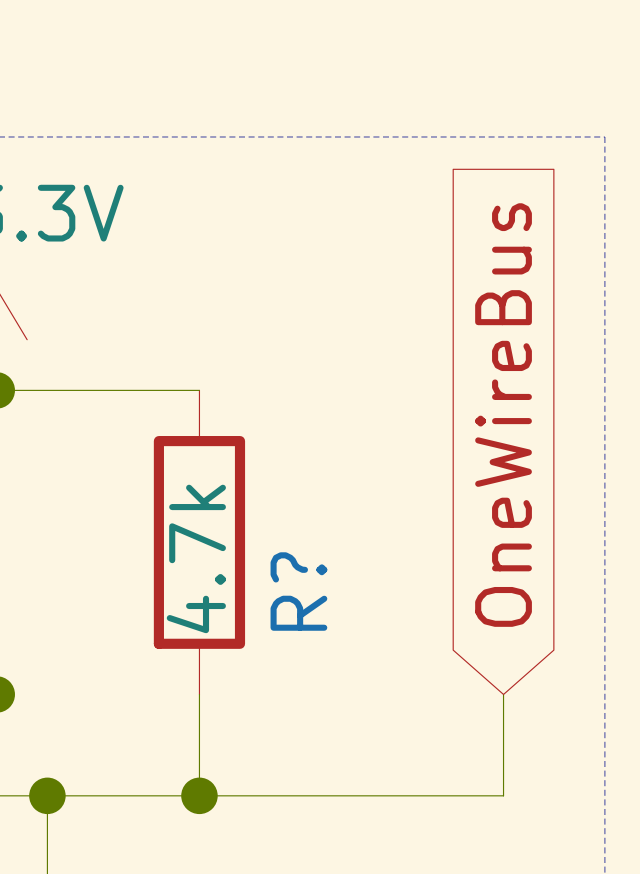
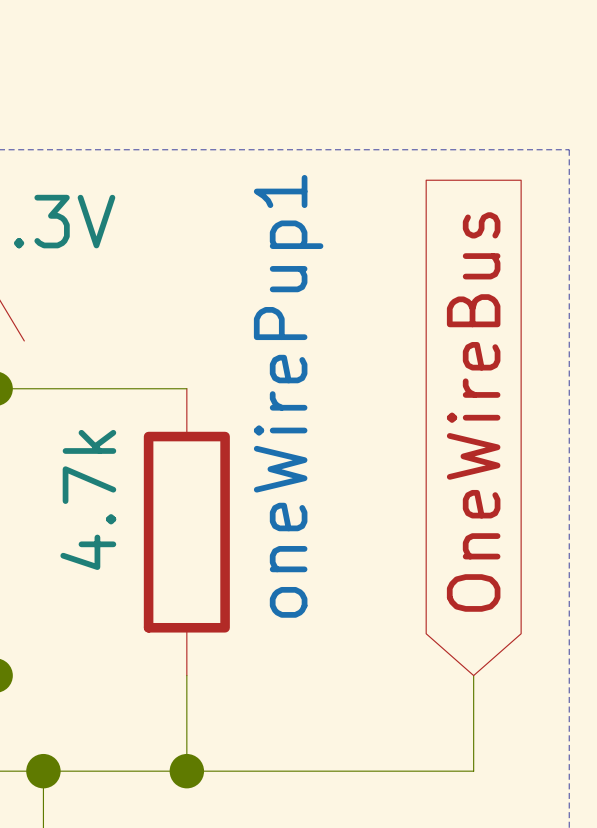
R? value position: 4.7k (196, 558) -> 4.7k (88, 499)
R? name: R? (298, 591) -> oneWirePup1 (288, 396)

